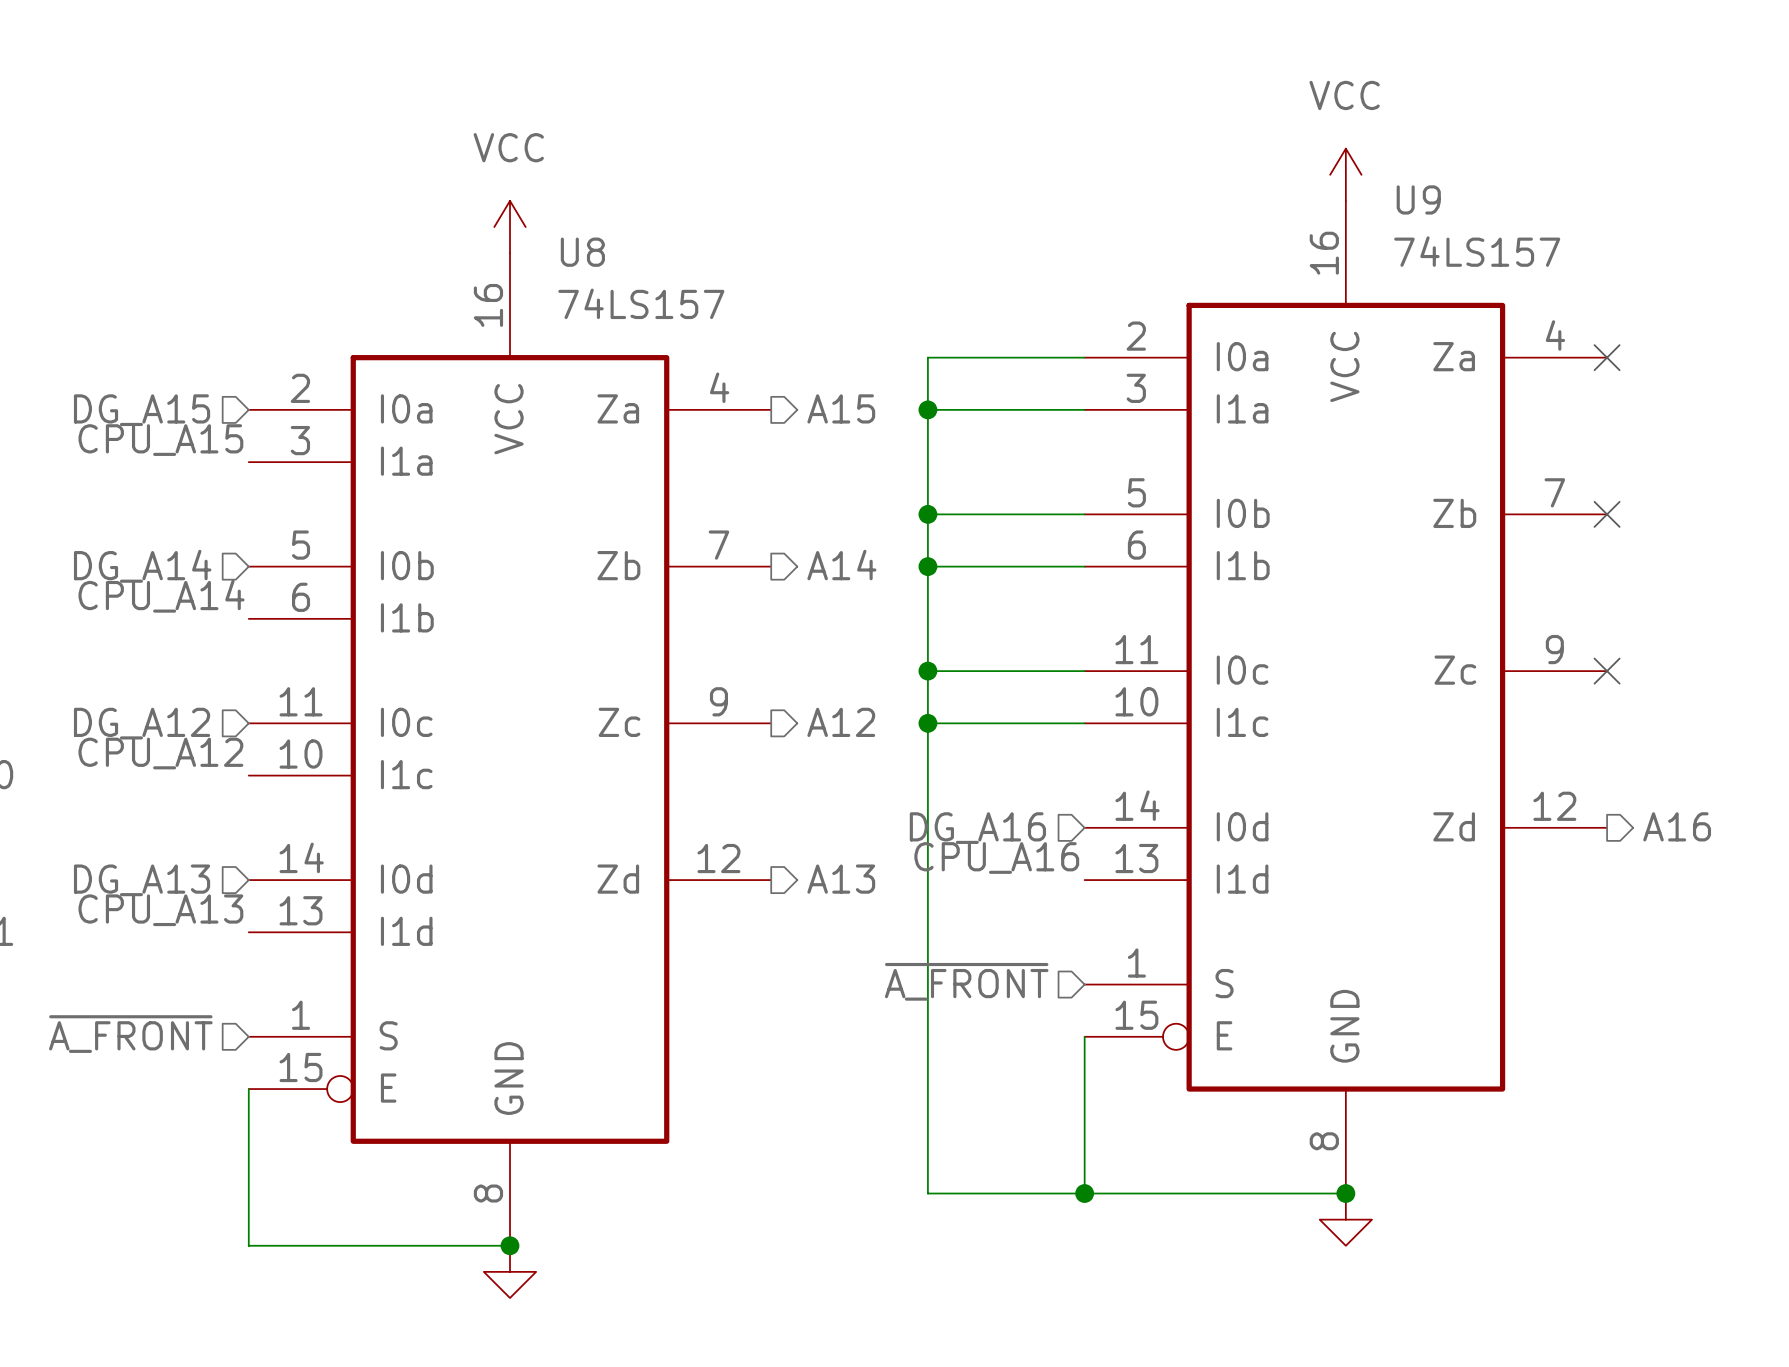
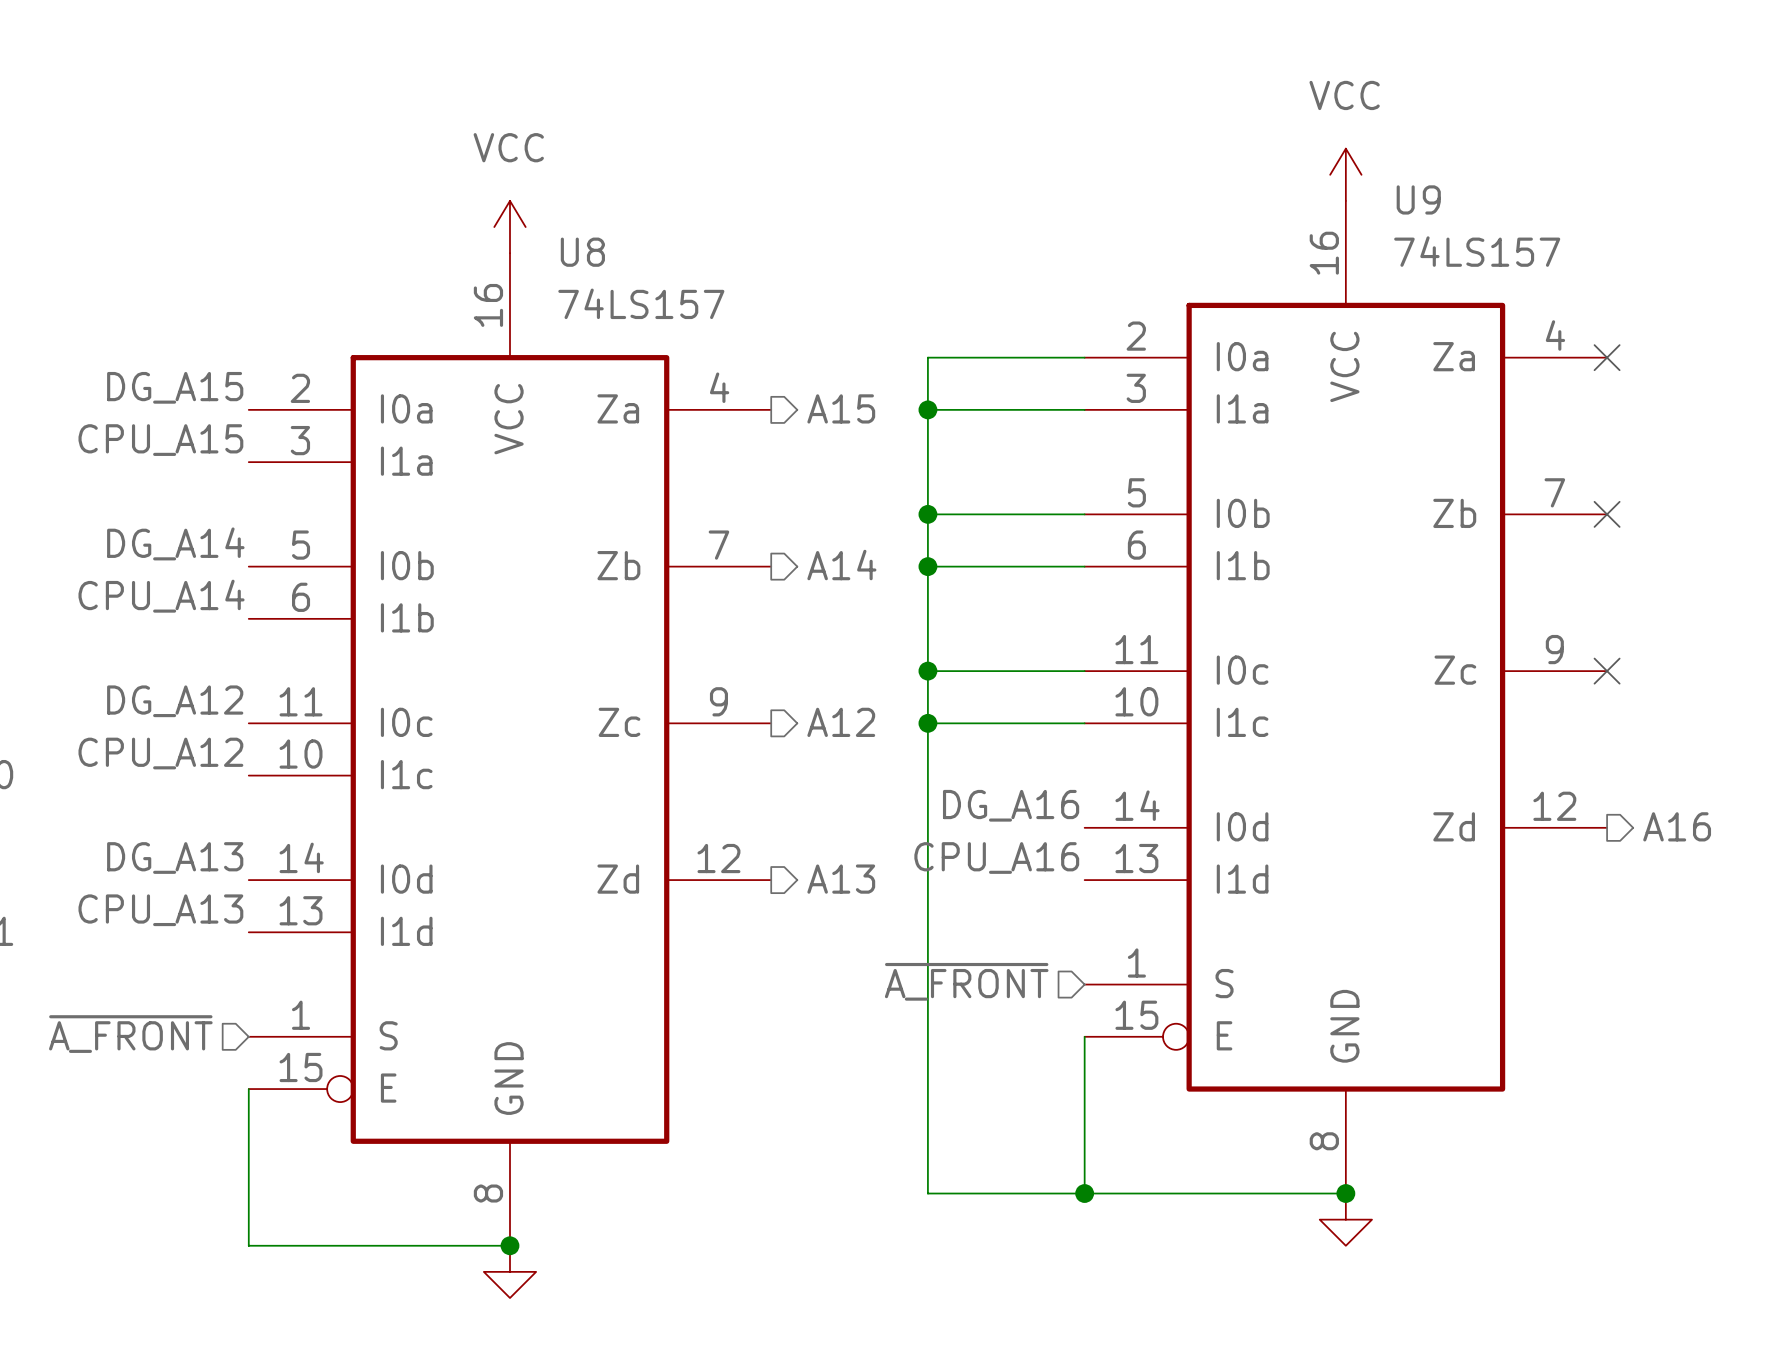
label: none -> DG_A15 (175, 387)
hierarchical label: DG_A15 (142, 410) -> none
label: none -> DG_A14 (175, 543)
hierarchical label: DG_A14 (142, 566) -> none
label: none -> DG_A12 (175, 701)
hierarchical label: DG_A12 (142, 723) -> none
label: none -> DG_A16 (1011, 805)
hierarchical label: DG_A16 (977, 828) -> none
label: none -> DG_A13 (175, 858)
hierarchical label: DG_A13 (142, 880) -> none

